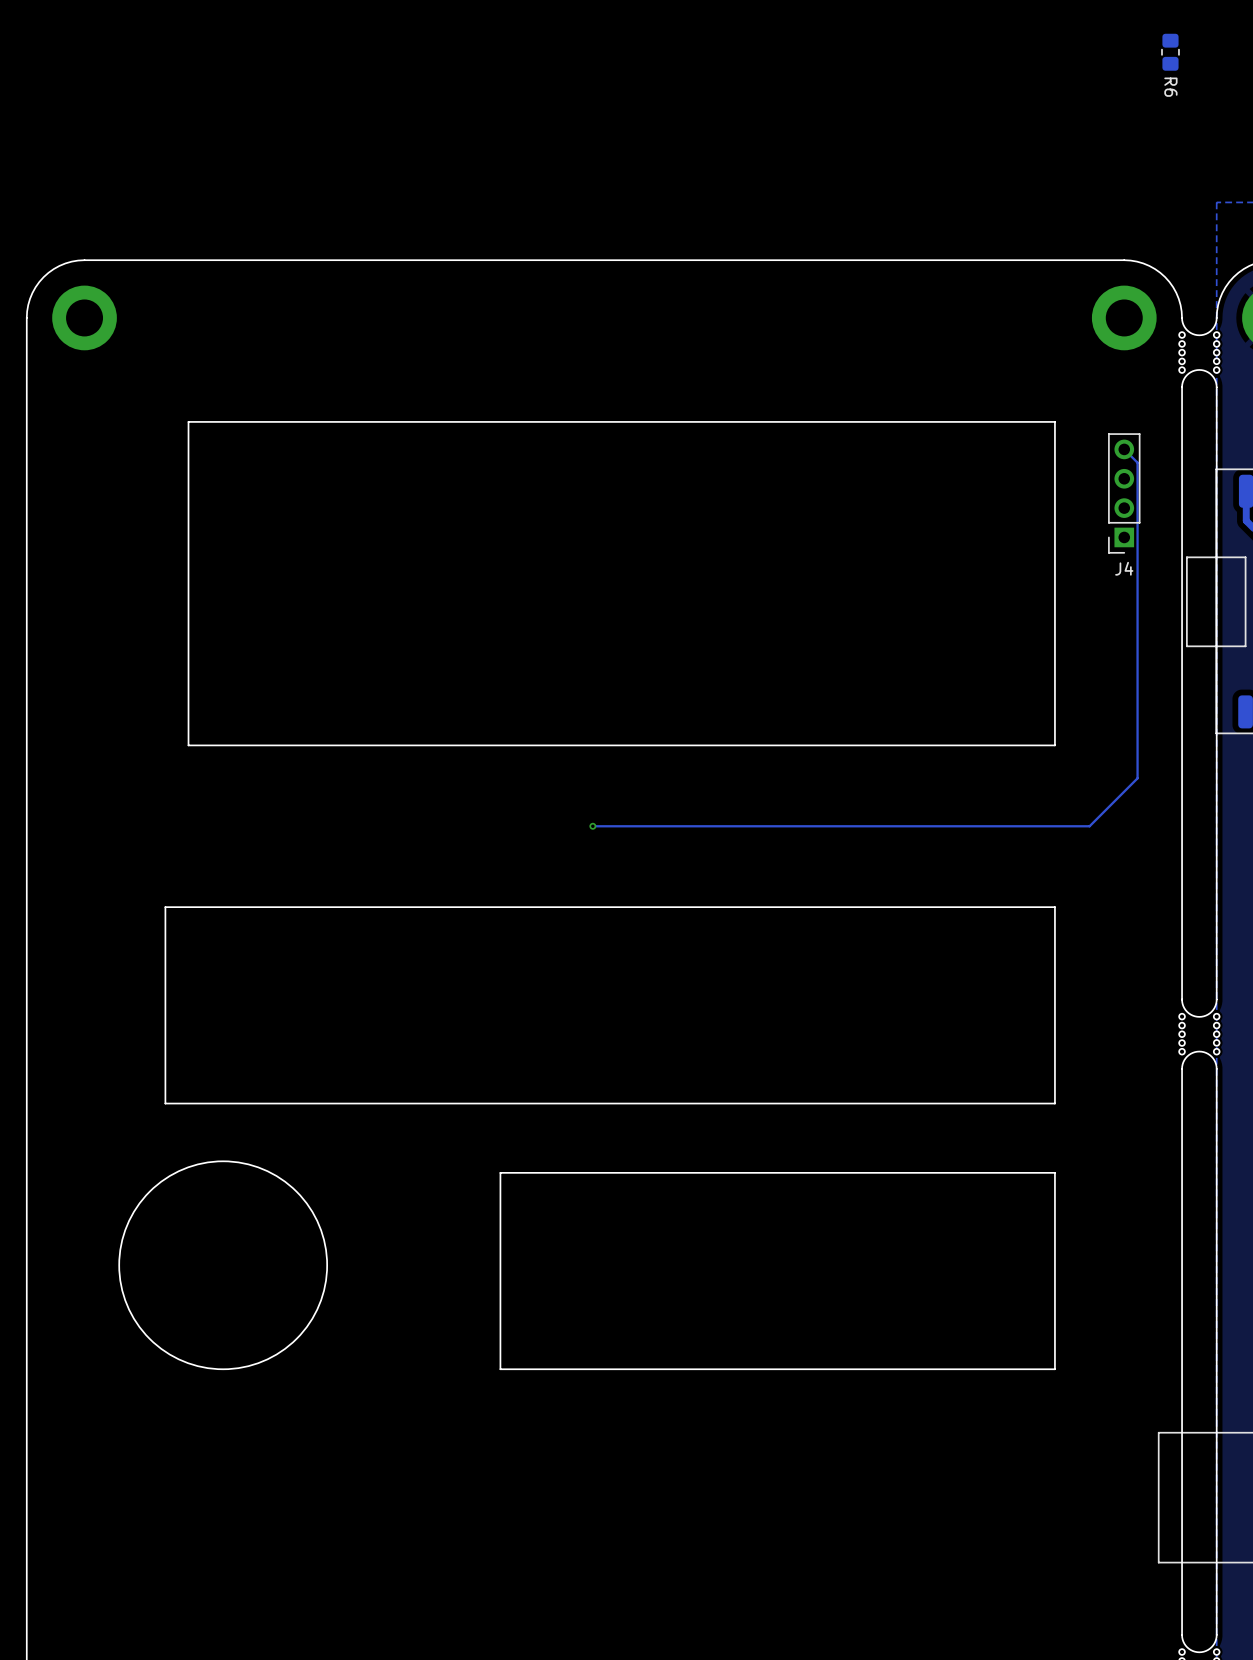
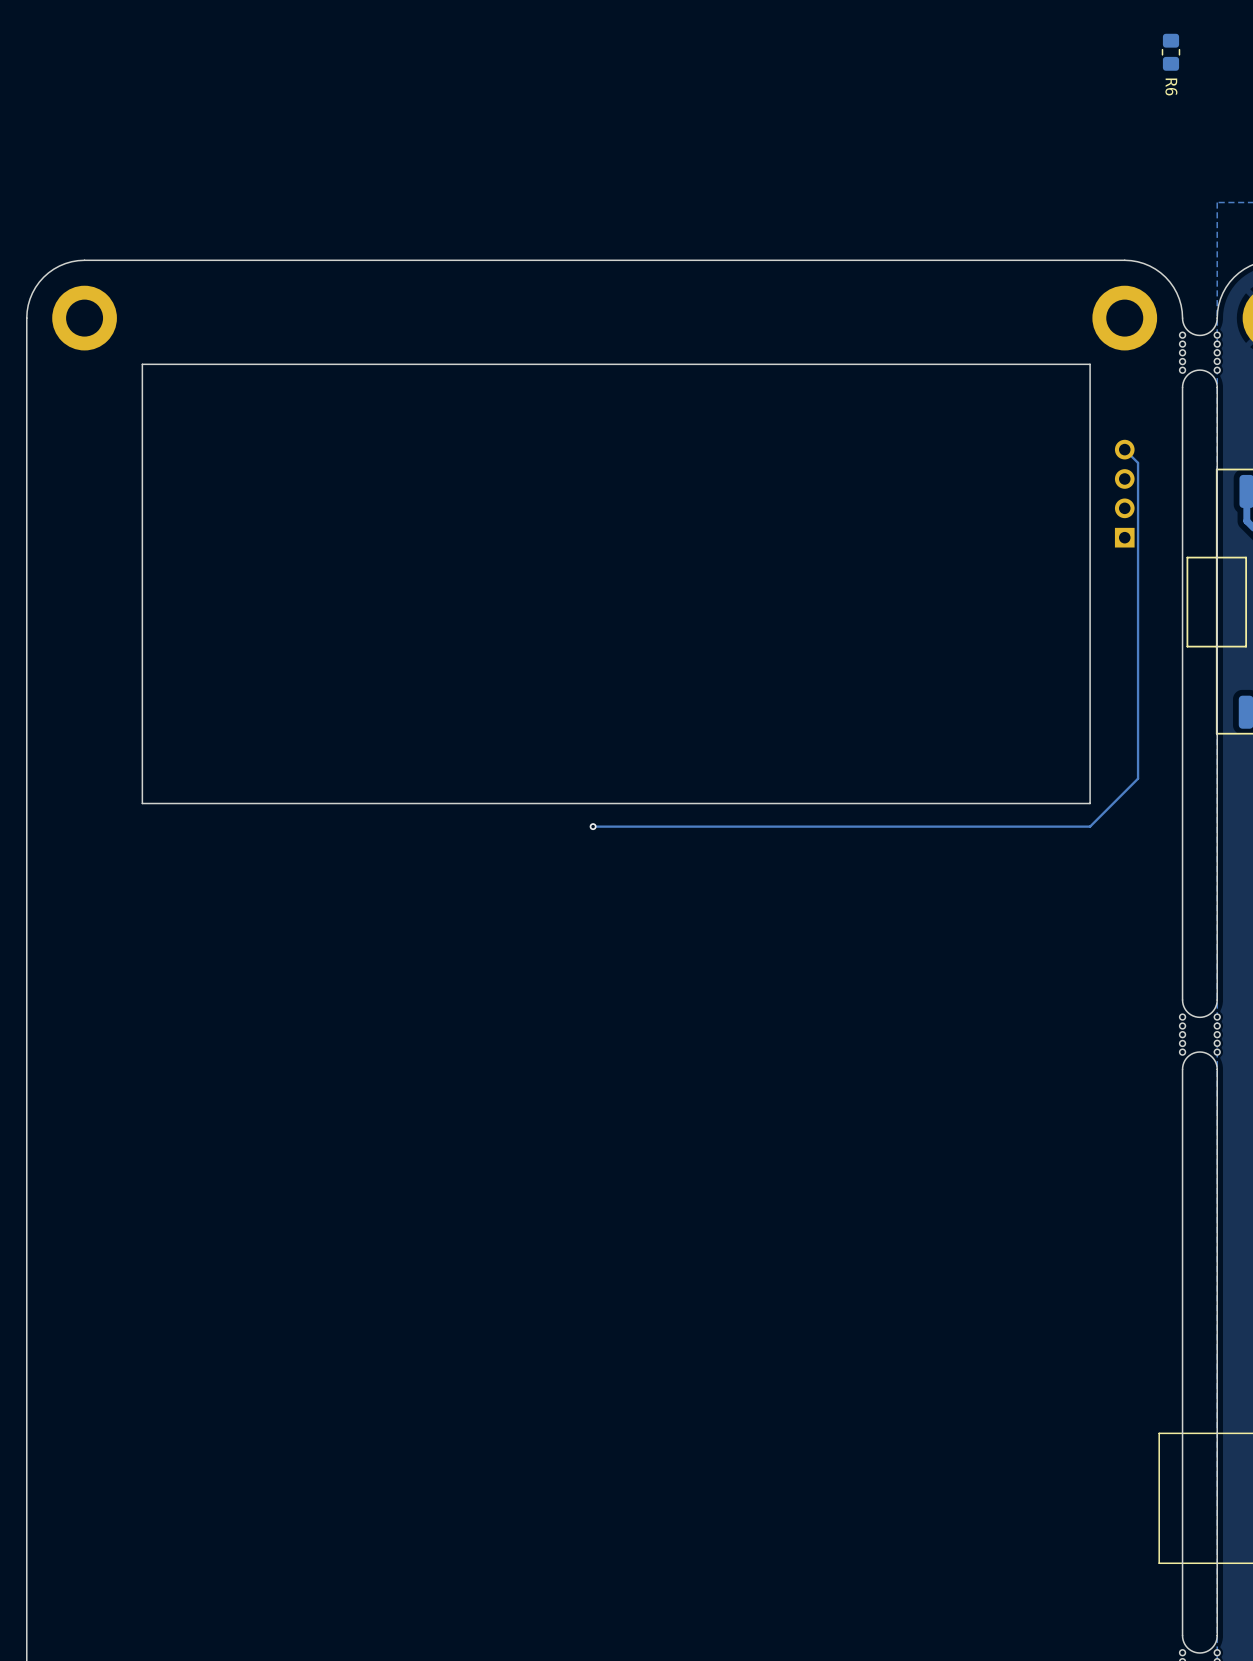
board edge: (1054, 421) (188, 421) (188, 745) (1054, 745) (1054, 421) -> (1090, 364) (1090, 803) (142, 803) (142, 364) (1090, 364)
J4 side: bottom (1124, 493) -> top (1124, 493)
board edge: (1054, 907) (1054, 1103) (165, 1103) (165, 907) (1054, 907) -> none
round board edge: [118, 1161, 328, 1370] -> none
board edge: (1054, 1172) (1054, 1369) (500, 1369) (500, 1172) (1054, 1172) -> none

